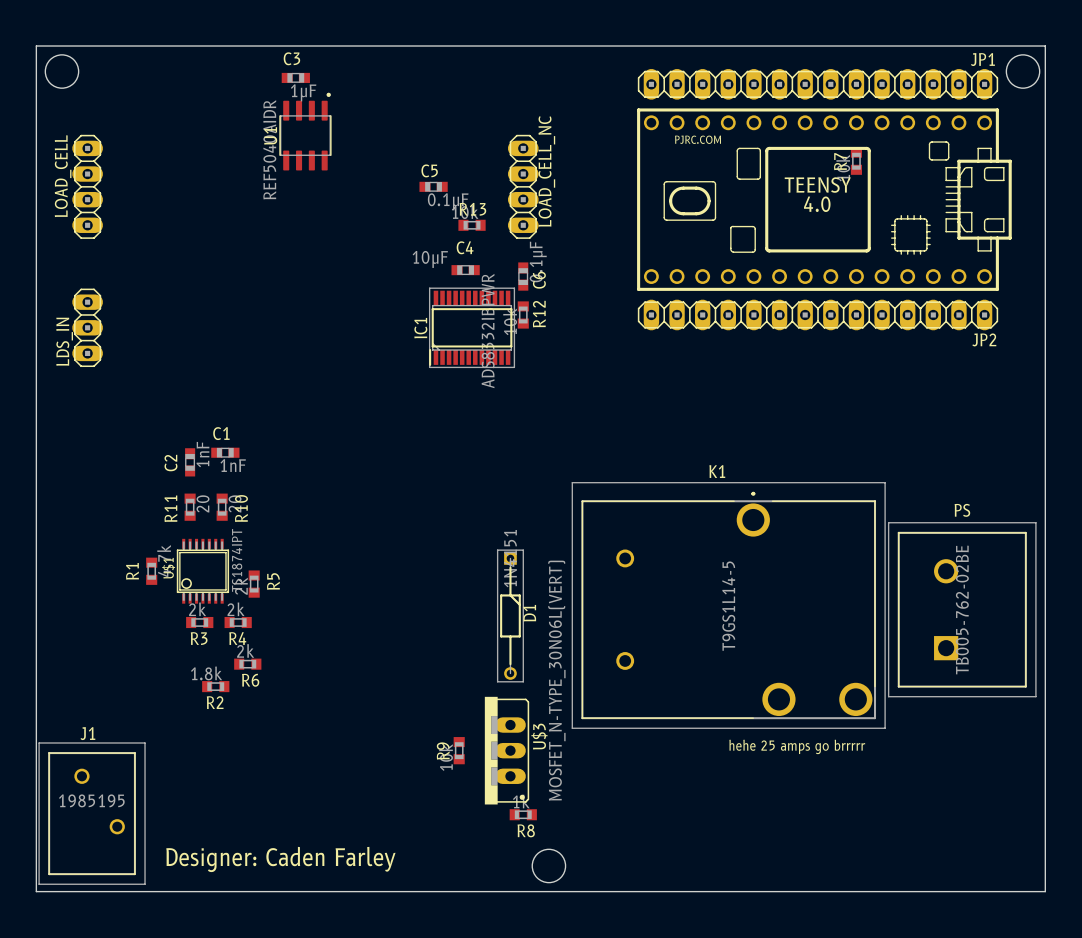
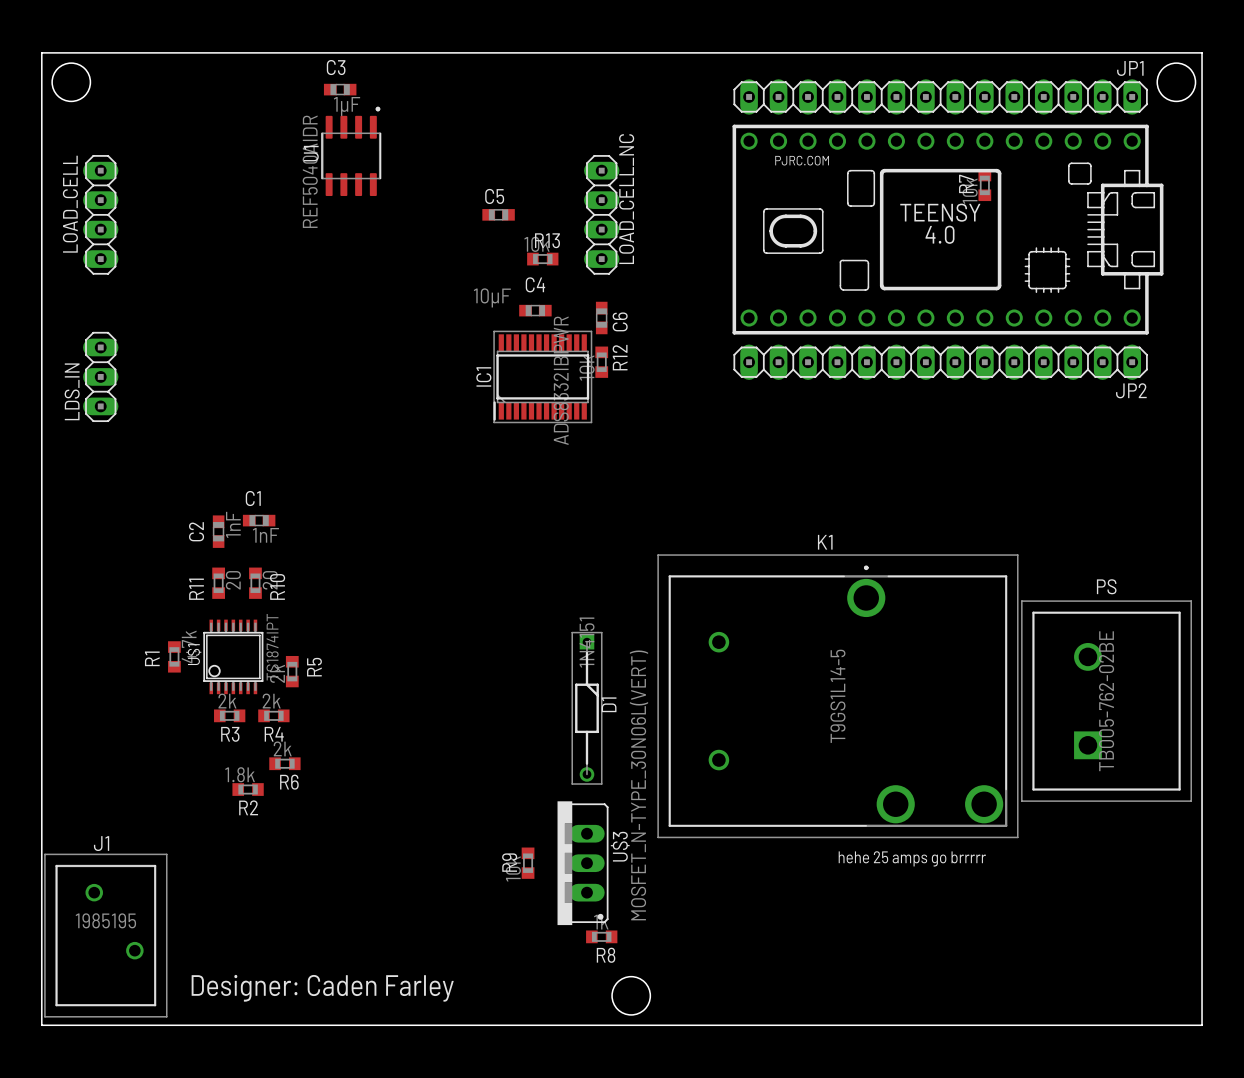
C5 value: 0.1μF (448, 201) -> none
C6 value: 0.1μF (538, 261) -> none

